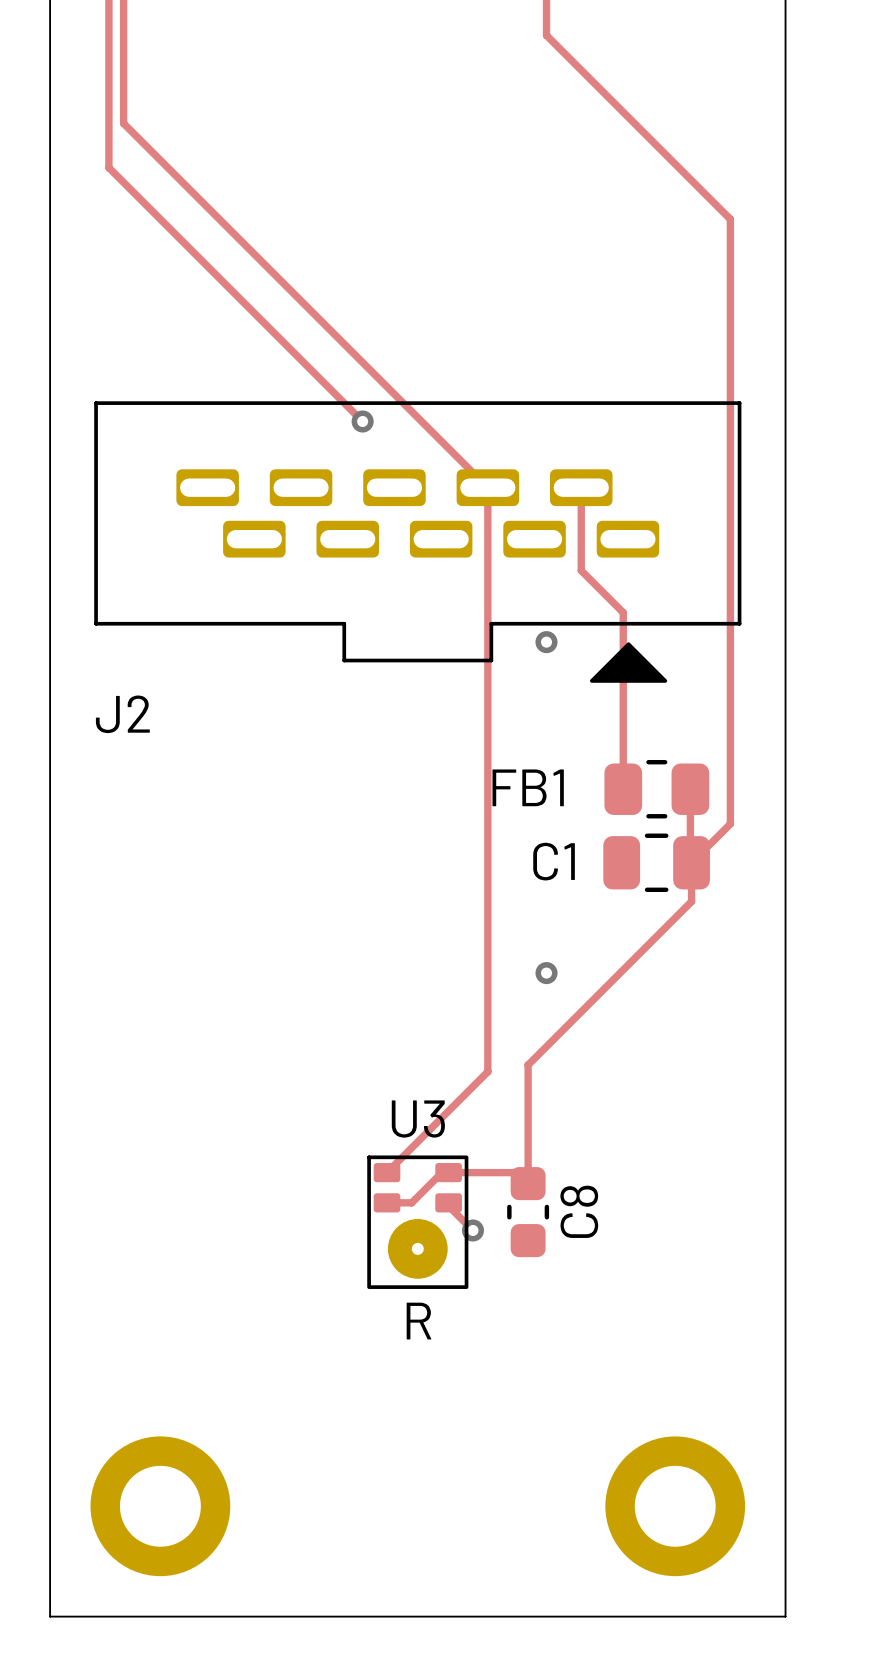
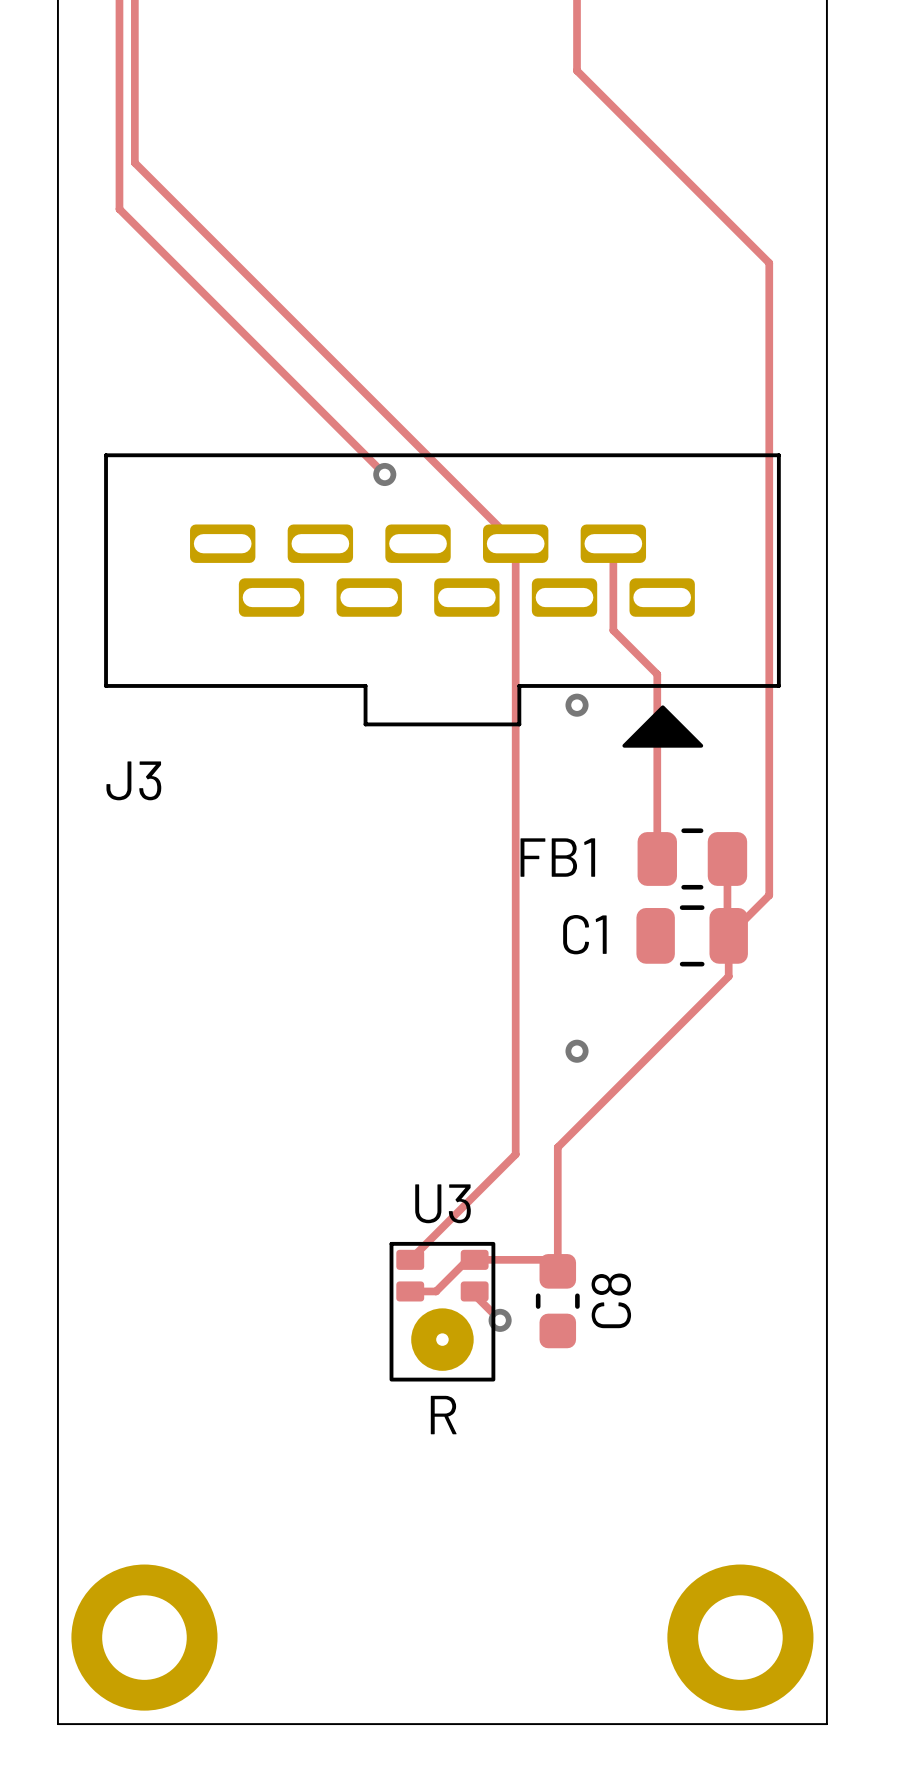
J2 name: J2 (122, 714) -> J3 (133, 780)
part position: (160, 1506) -> (144, 1637)
part position: (675, 1506) -> (740, 1637)

